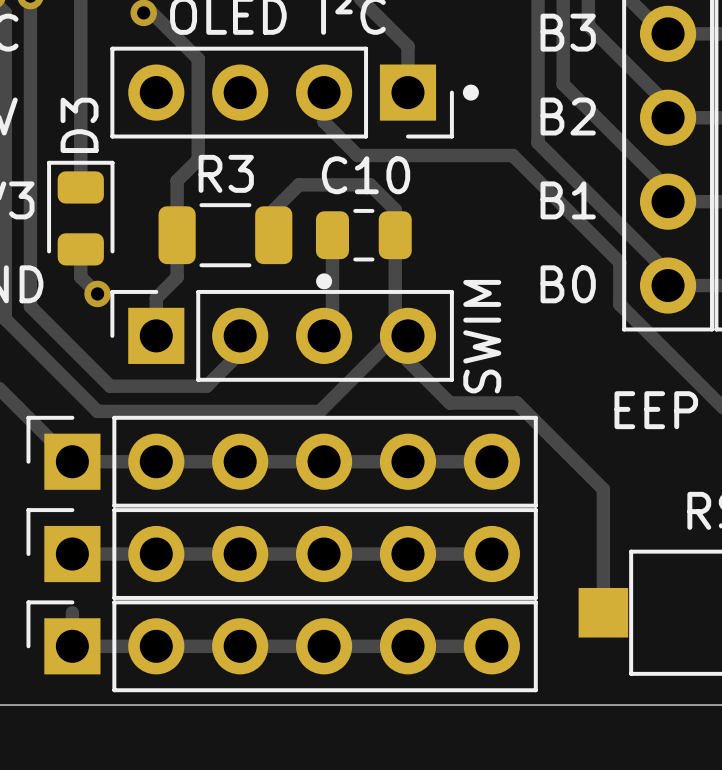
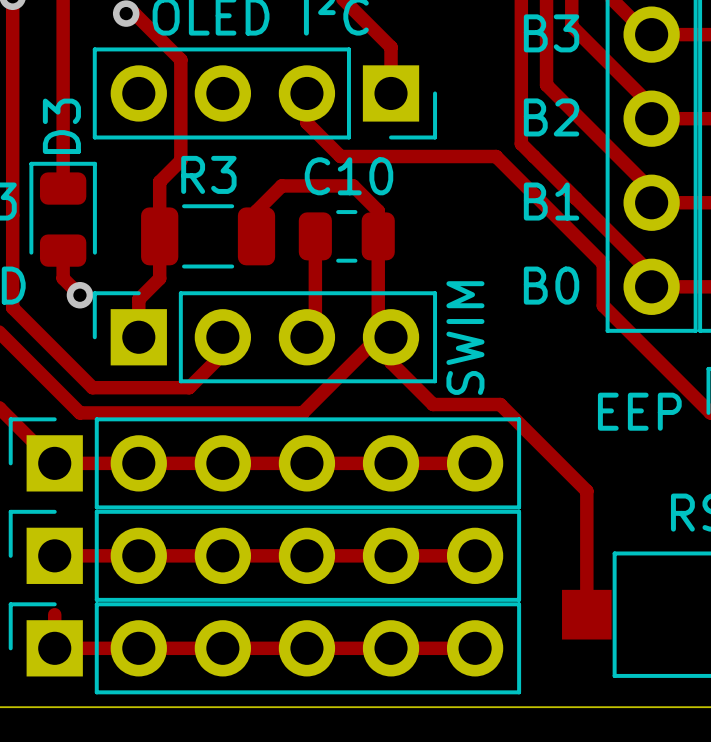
drawing: [462, 84, 479, 101] -> none
drawing: [316, 273, 333, 290] -> none

